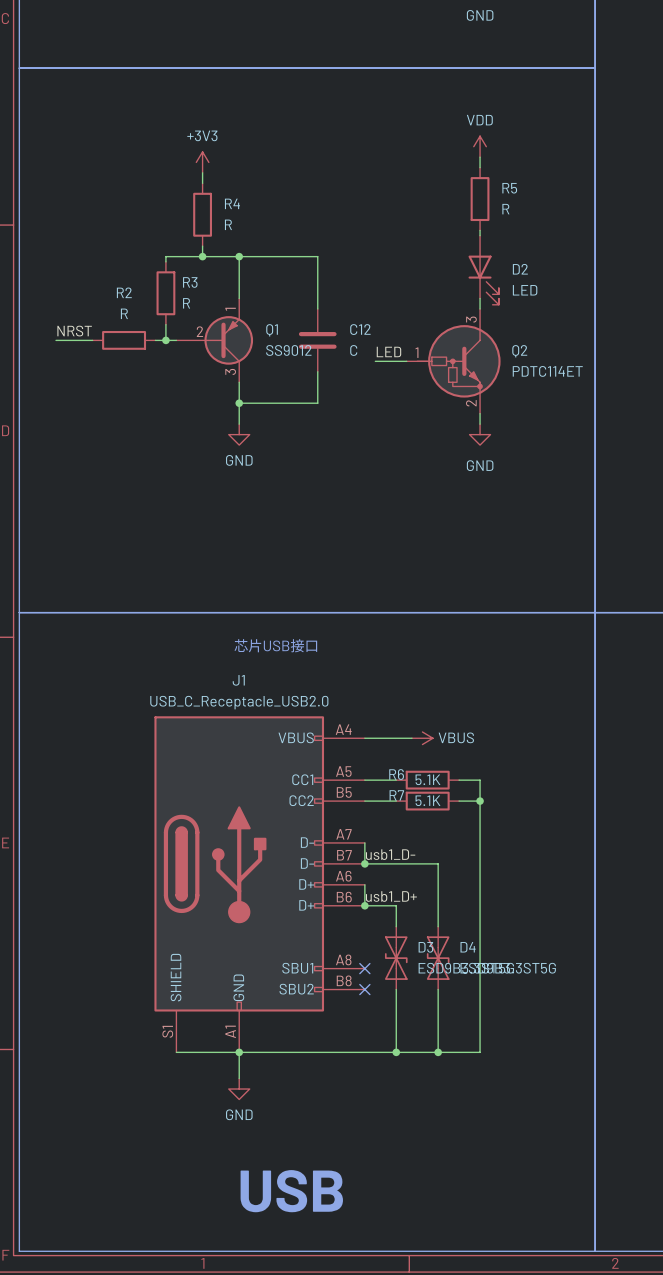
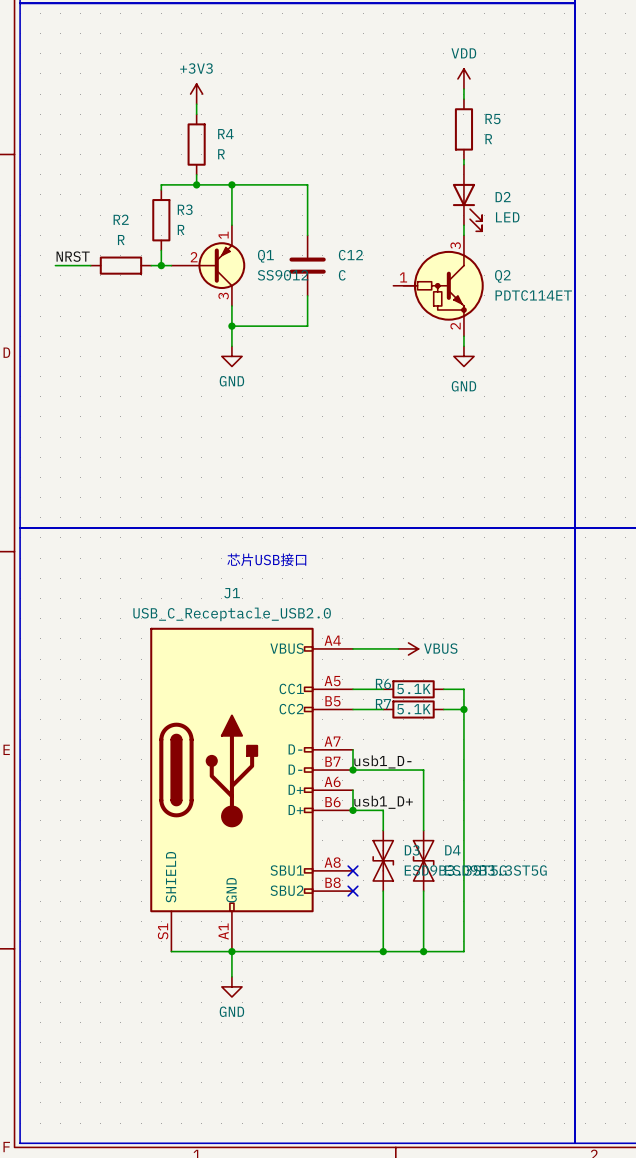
label: LED (388, 351) -> none
wire: (375, 361) (406, 361) -> none
text: USB (291, 1191) -> none

